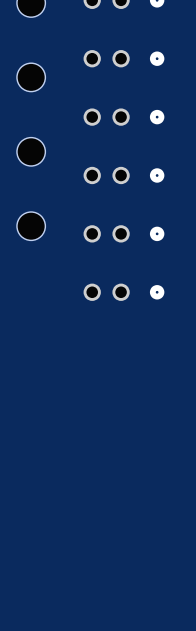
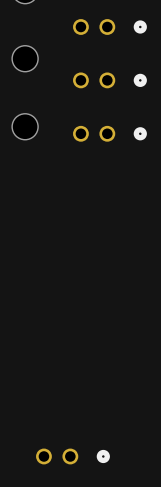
part: (123, 292) -> none
part: none -> (72, 456)

